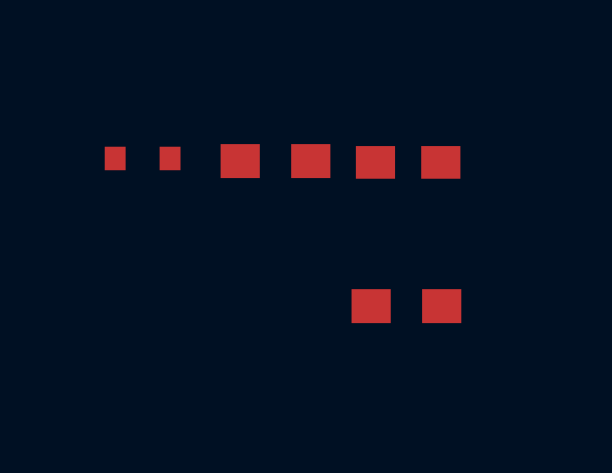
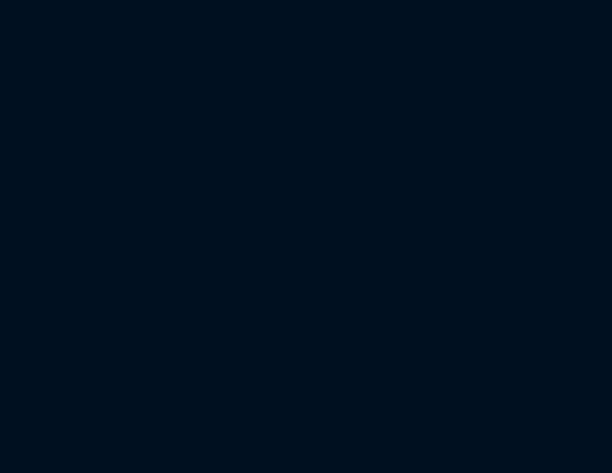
part: (142, 158) -> none
part: (275, 161) -> none
part: (408, 162) -> none
part: (406, 306) -> none

